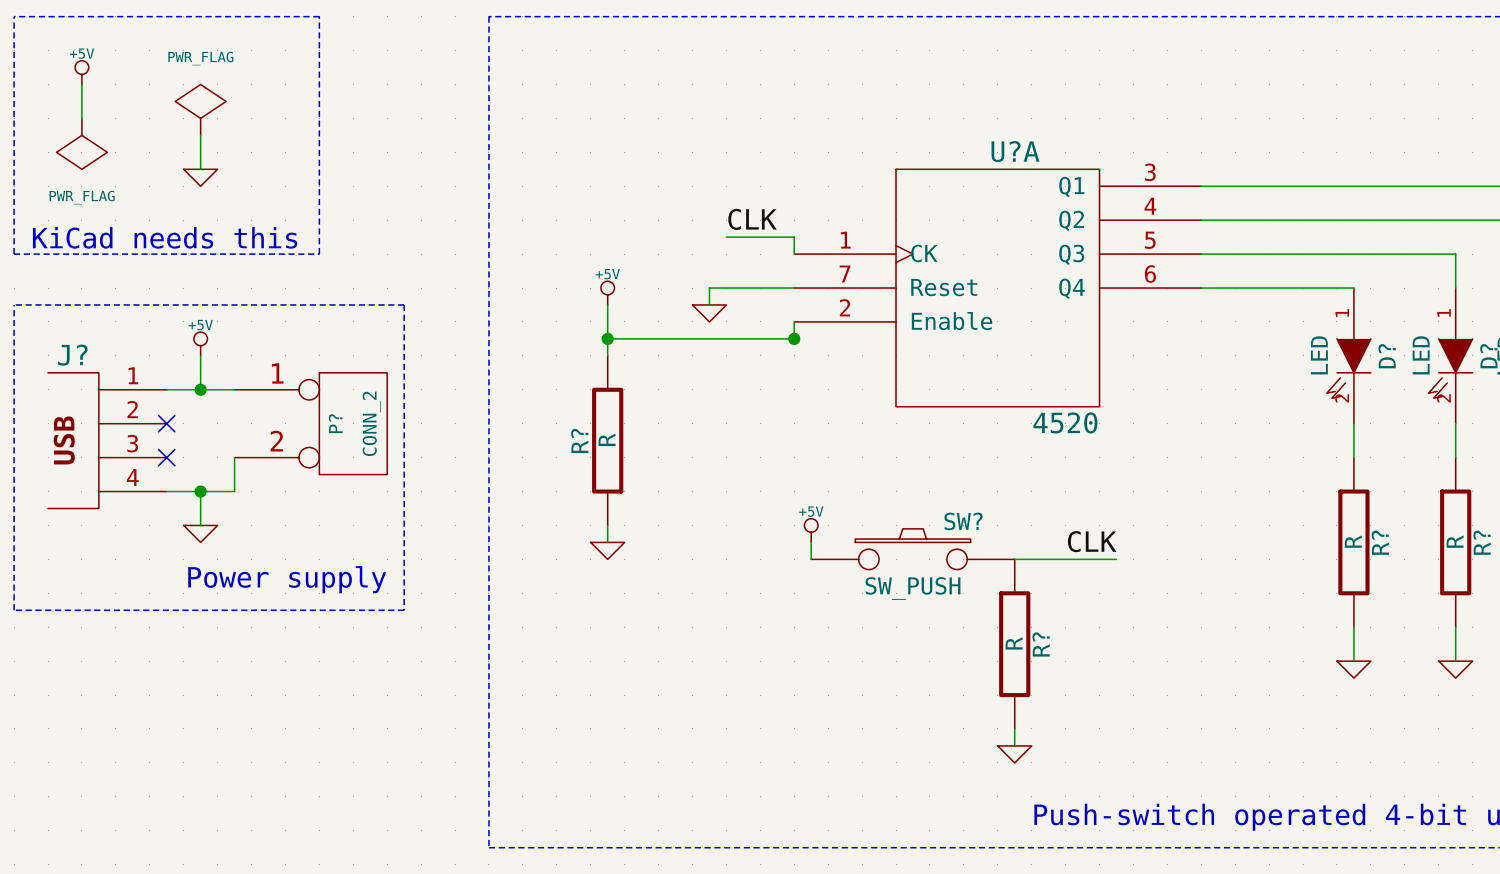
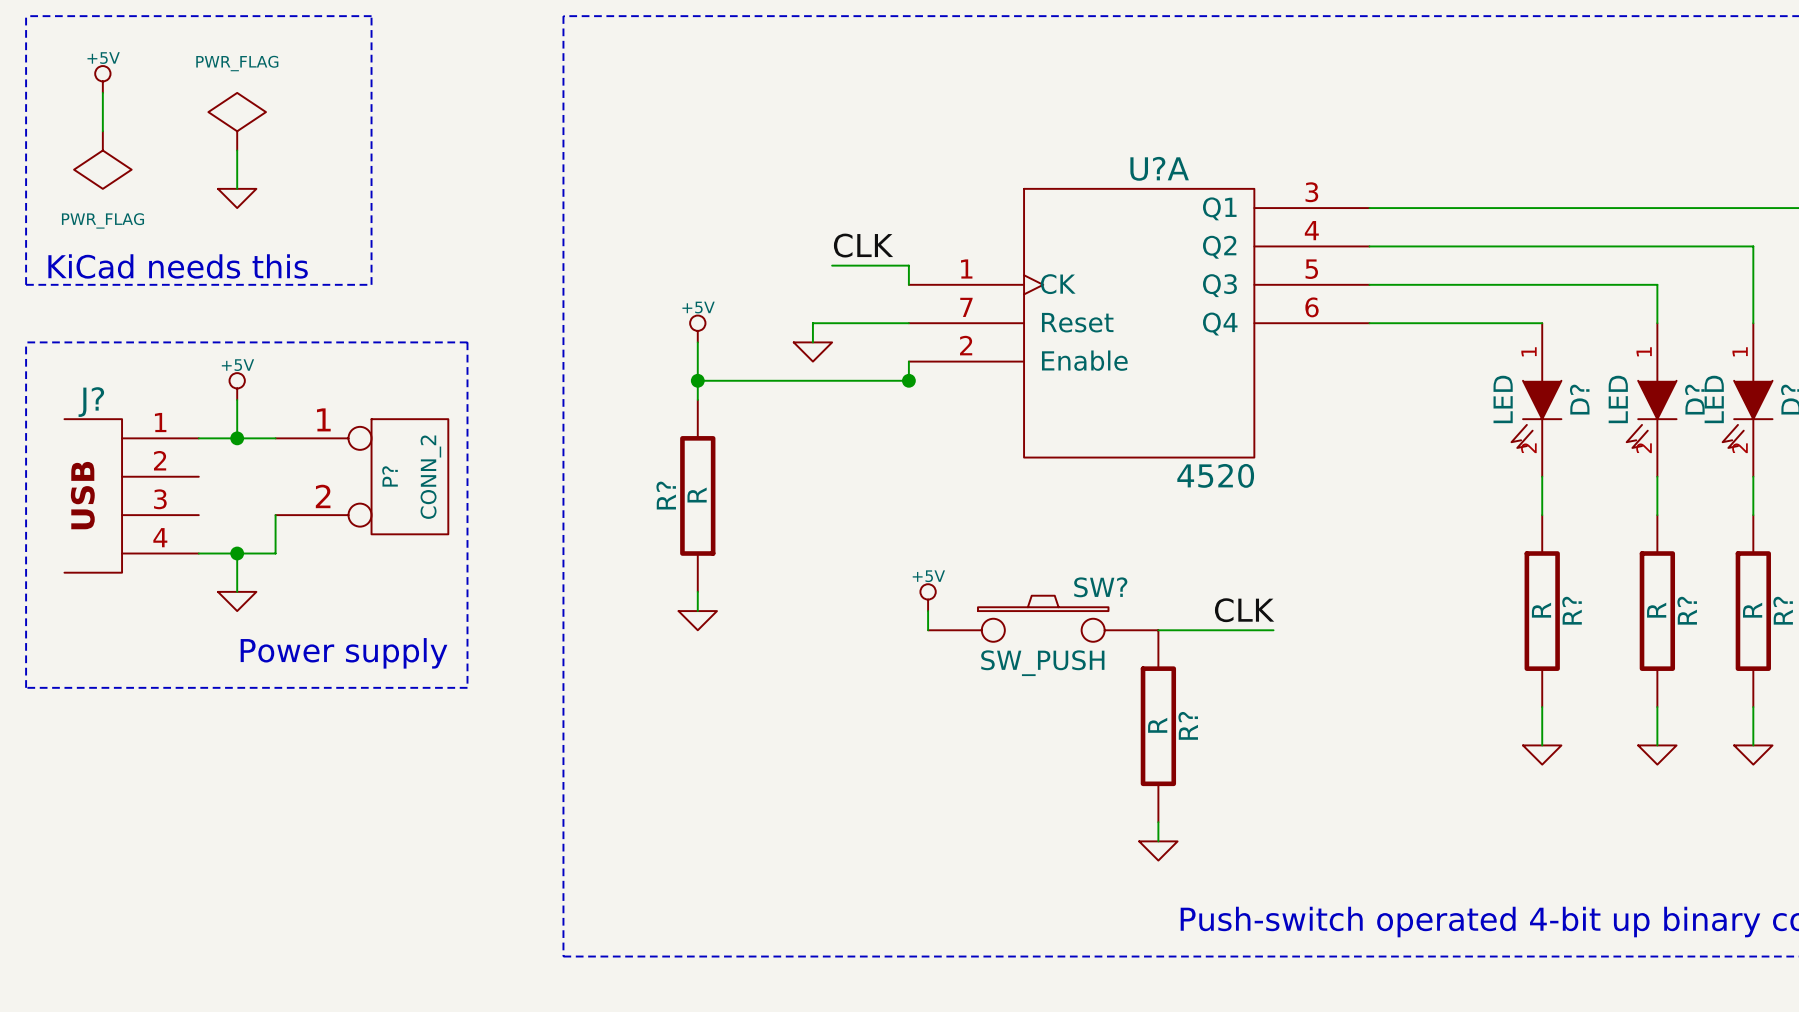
no-connect mark: (166, 423) -> none
no-connect mark: (166, 457) -> none

